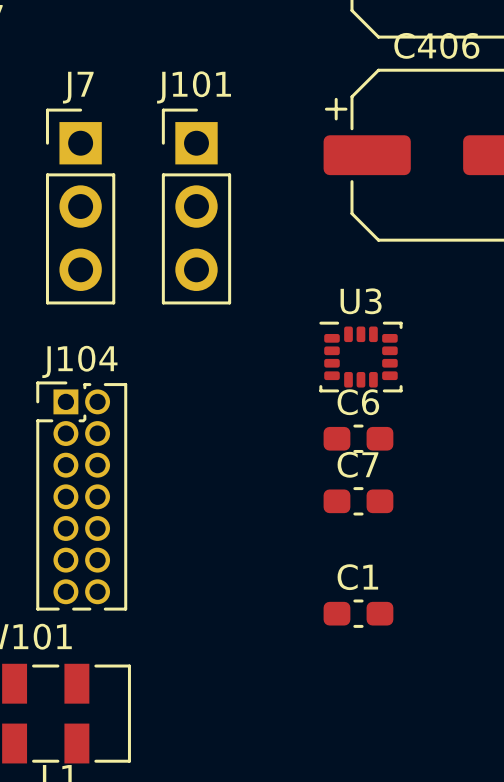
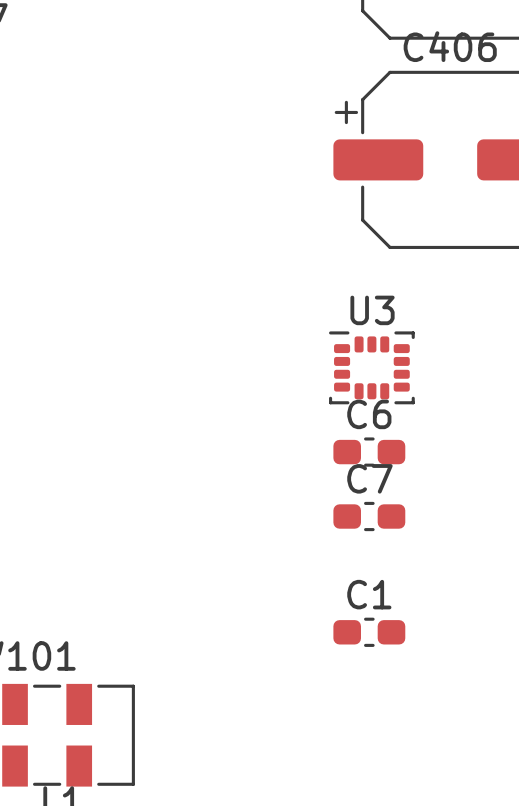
J7: (80, 206) -> none
J101: (196, 206) -> none
J104: (81, 496) -> none

